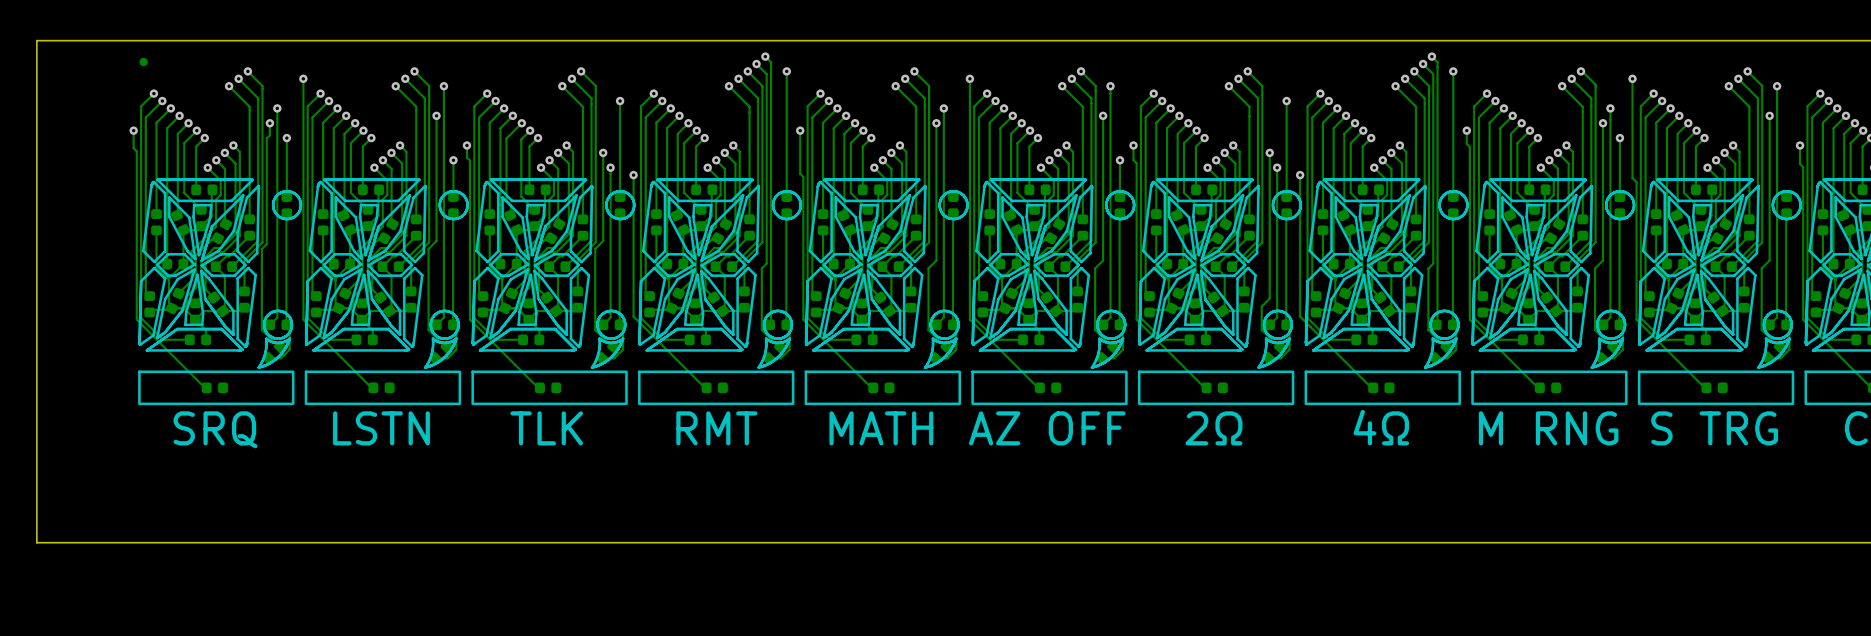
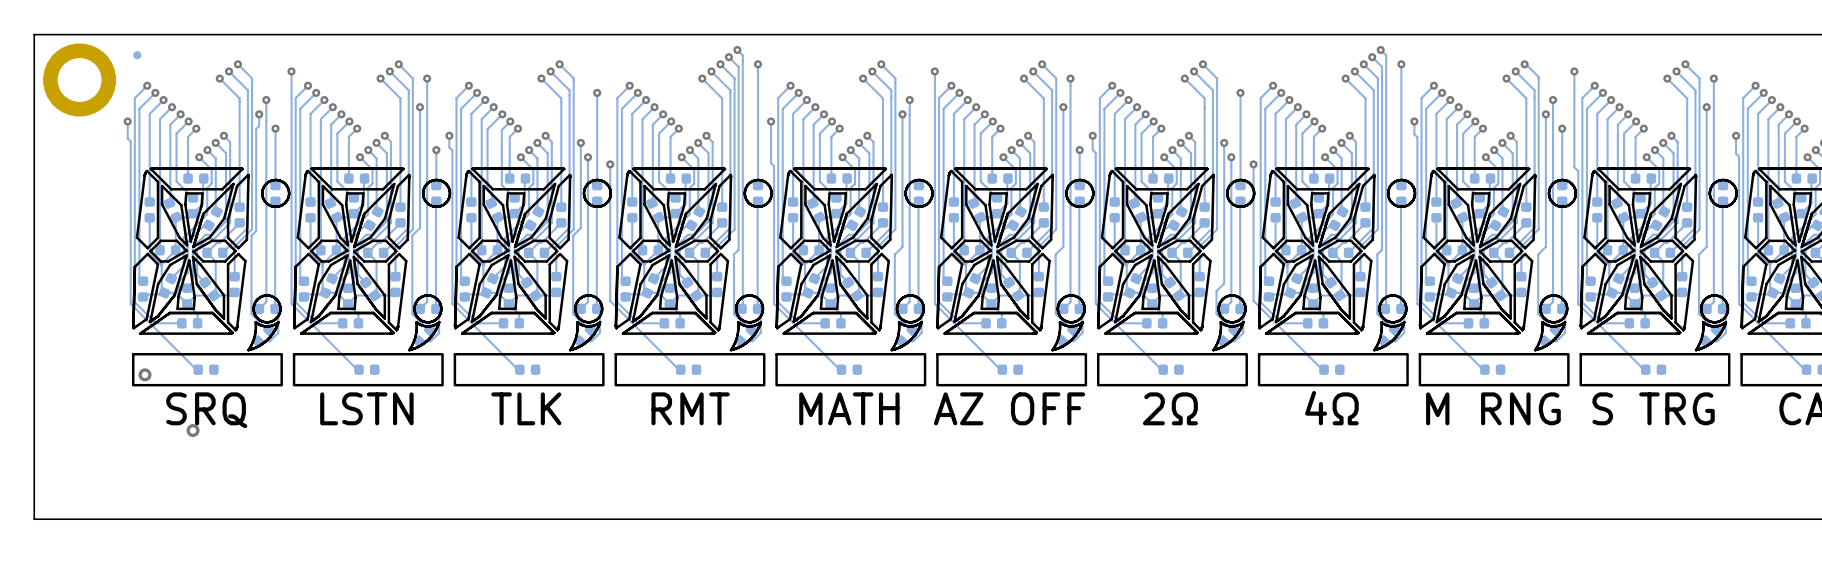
part: none -> (79, 79)
via: none -> (145, 374)
via: none -> (193, 430)

